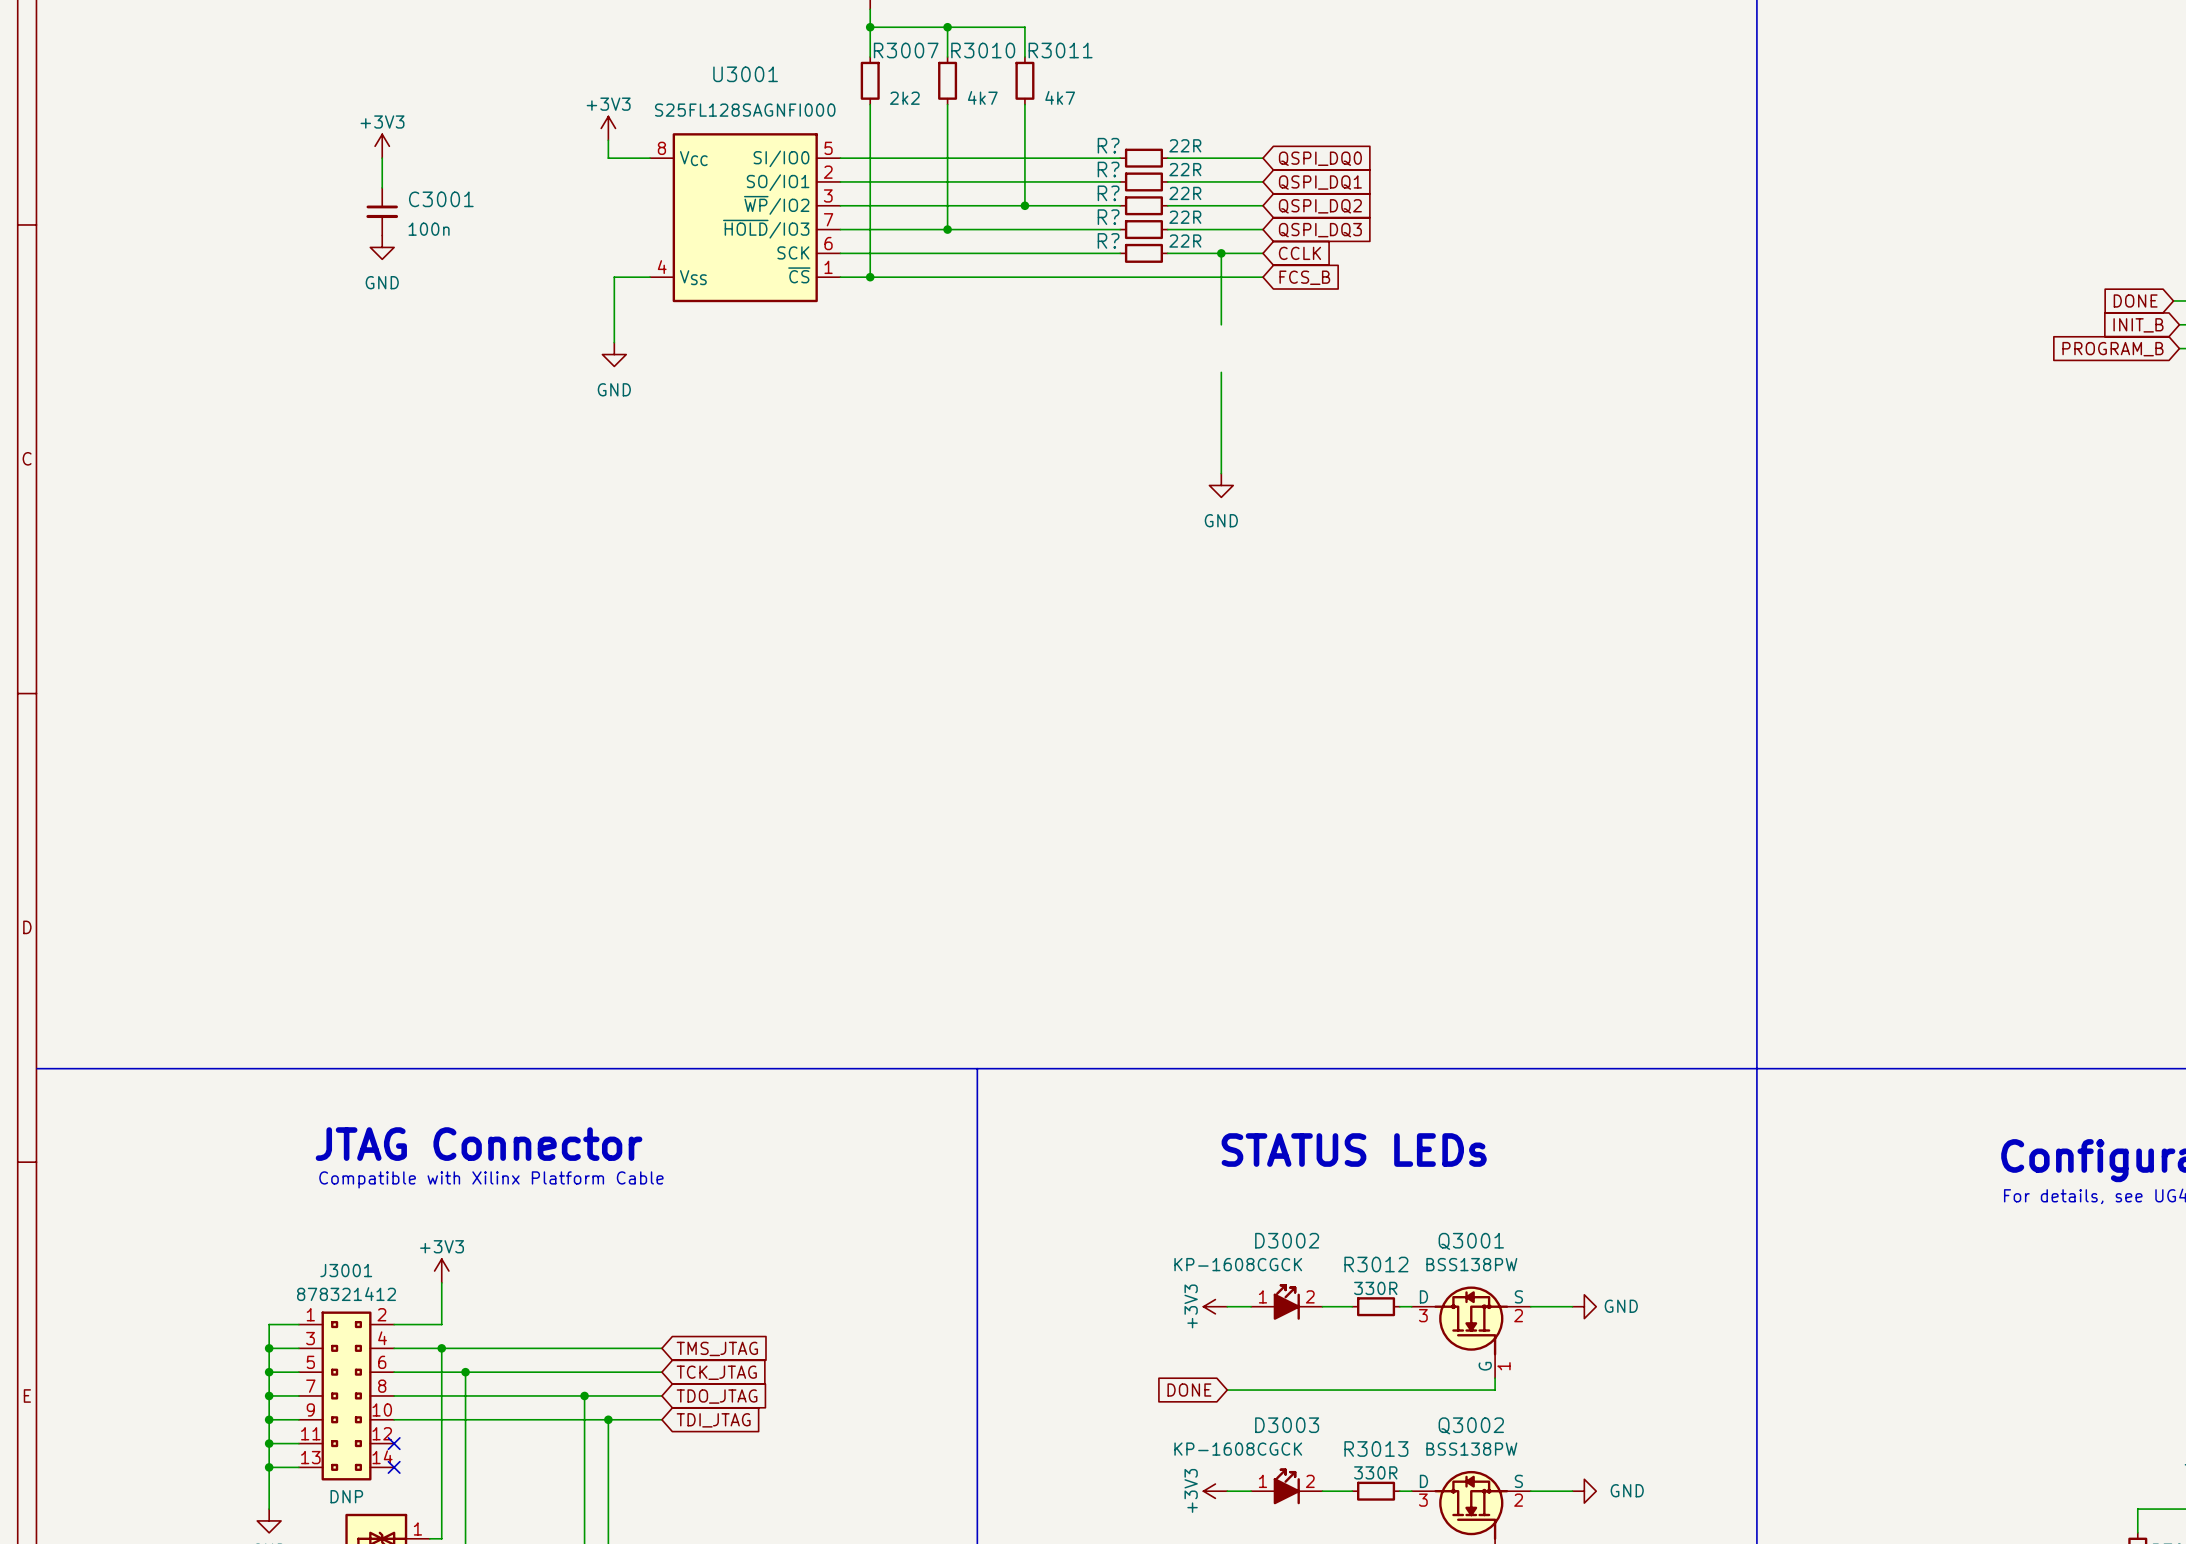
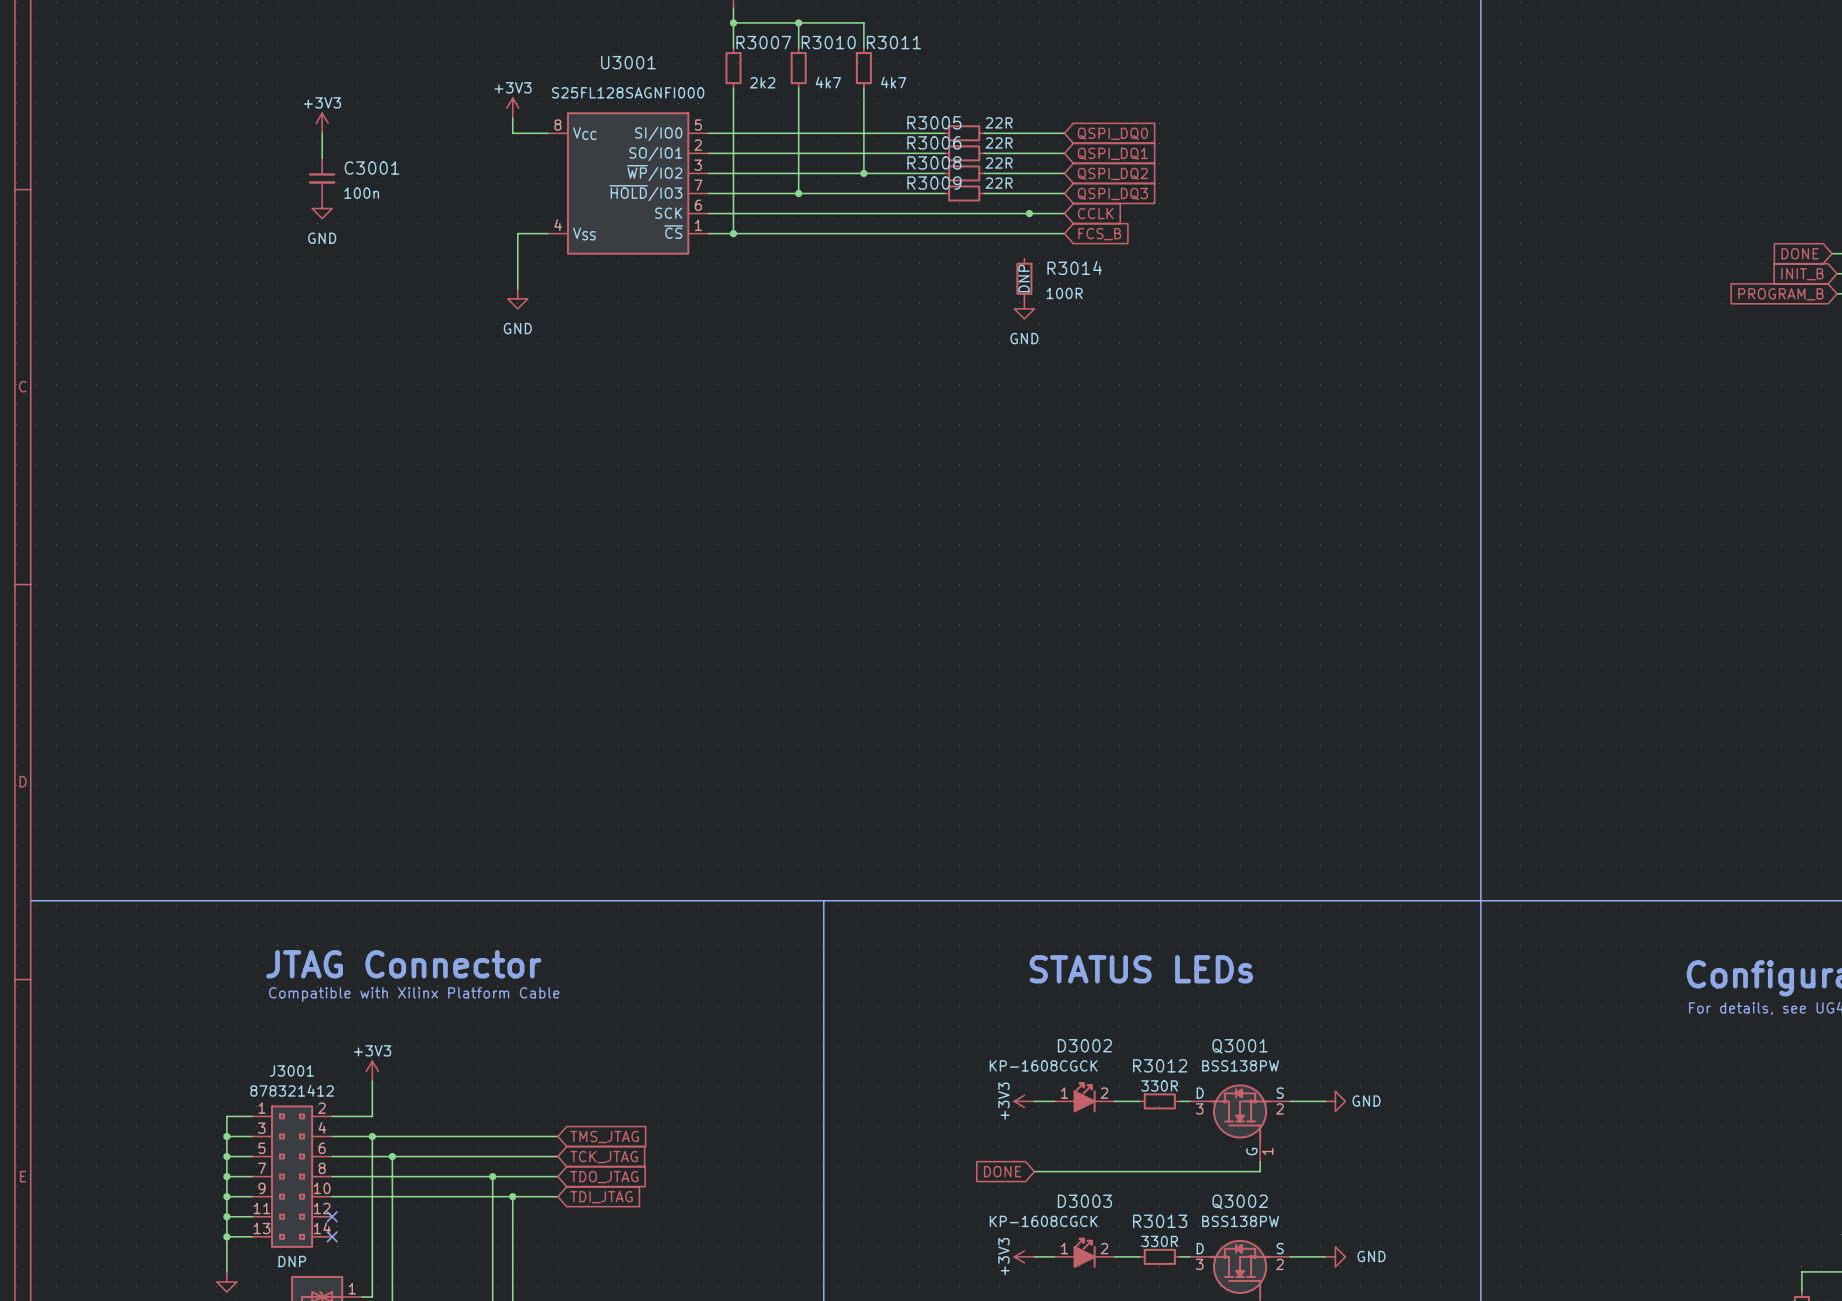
R? name: R? (1108, 145) -> R3005 (934, 122)
R? name: R? (1108, 169) -> R3006 (934, 142)
R? name: R? (1108, 193) -> R3008 (934, 162)
R? name: R? (1108, 217) -> R3009 (934, 183)
wire: none -> (944, 213) (984, 213)
R?: (1143, 253) -> none
wire: (1221, 253) (1221, 324) -> none
R3014: none -> (1024, 278)
wire: (1221, 372) (1221, 473) -> none
power symbol position: GND (1221, 485) -> GND (1024, 308)

